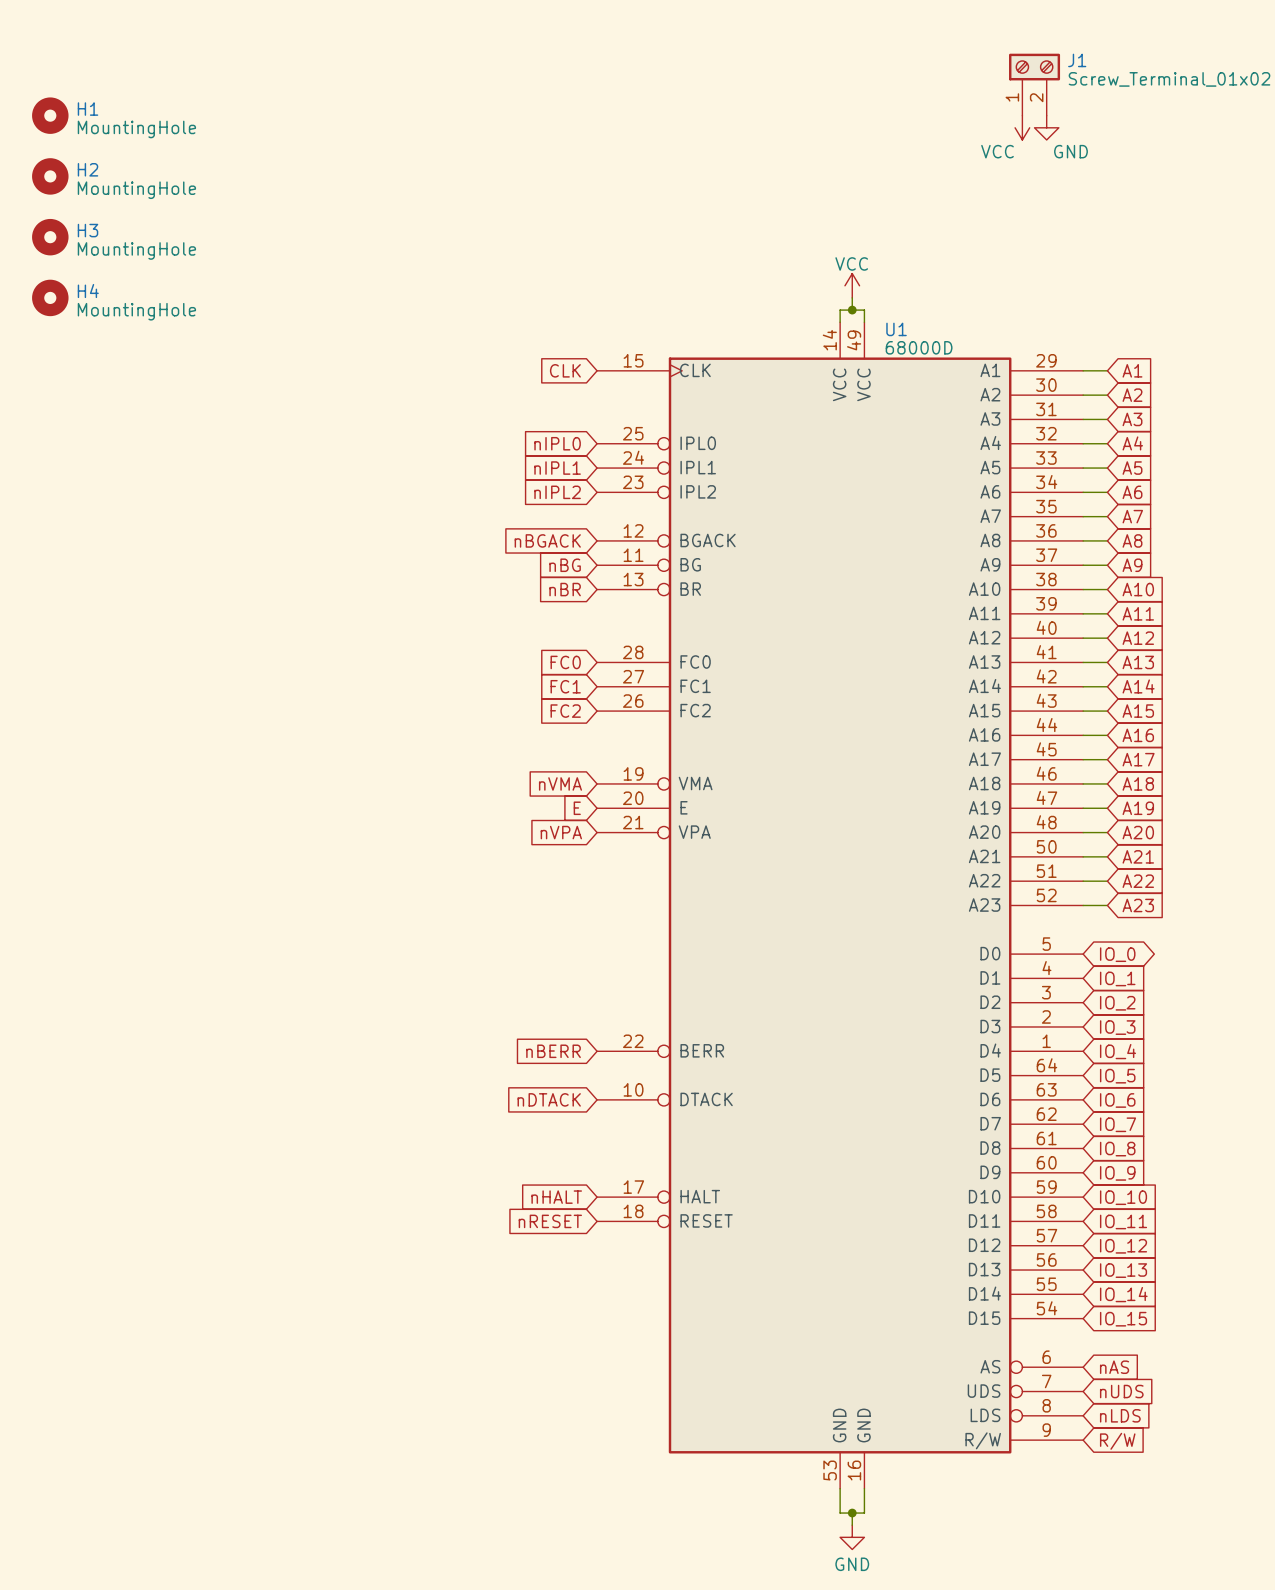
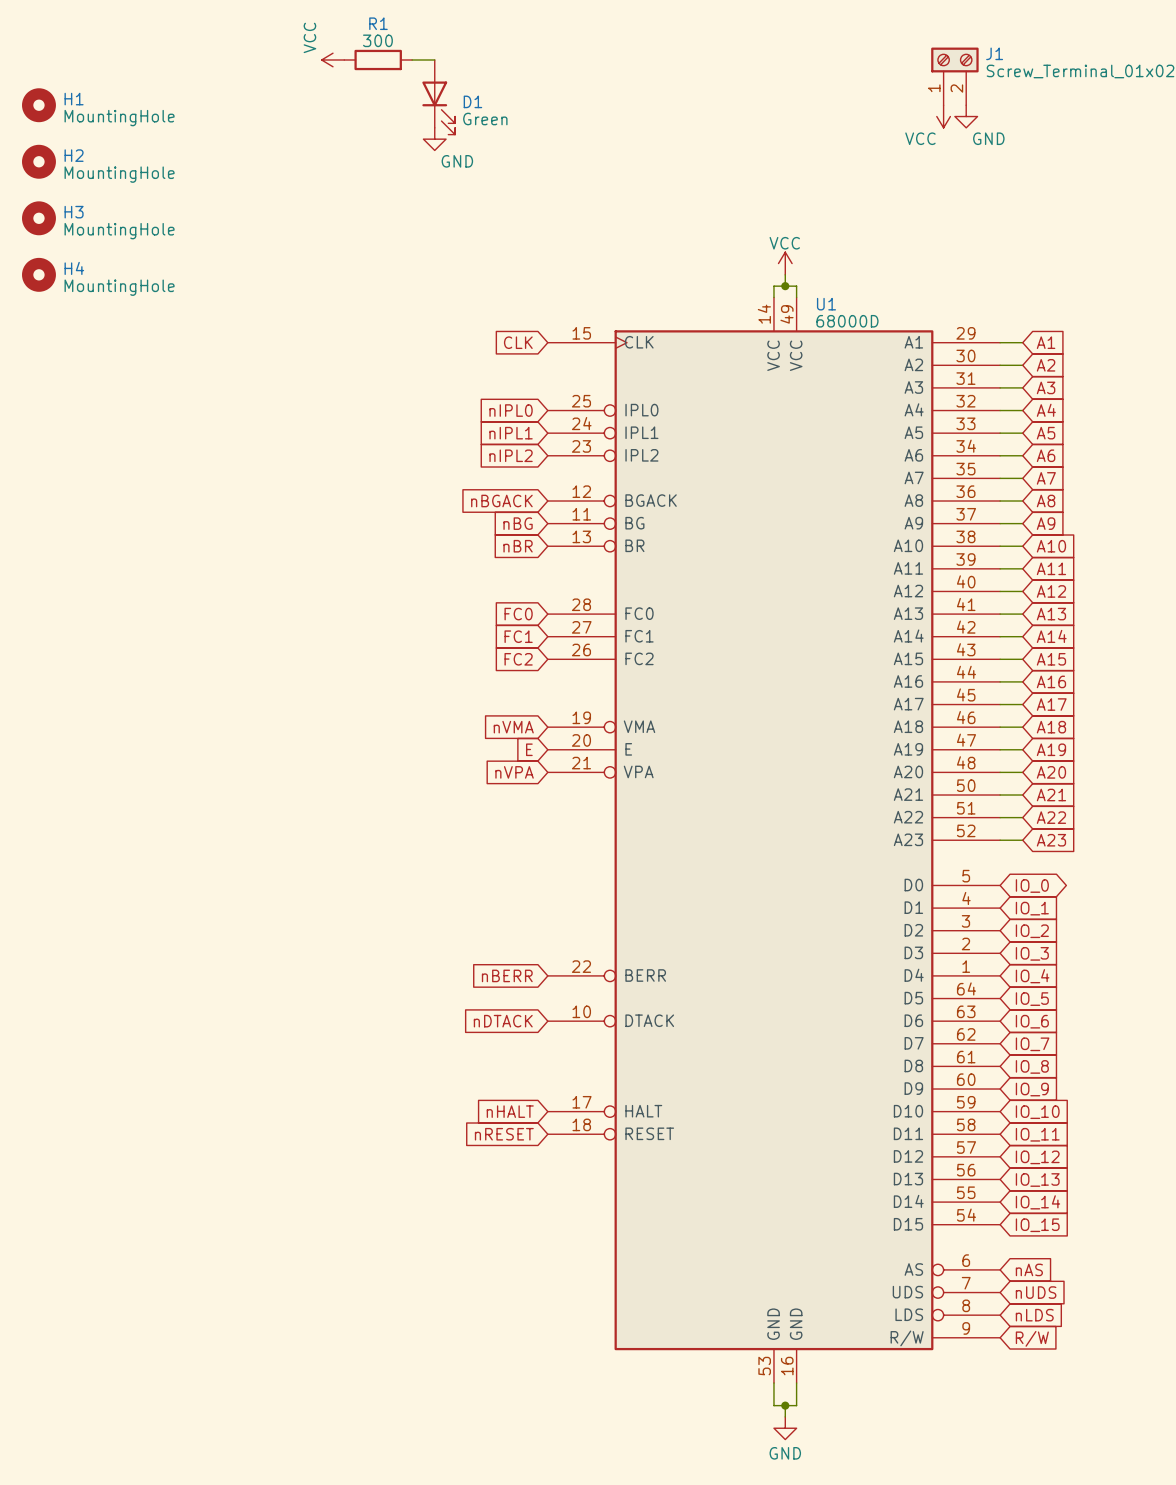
power symbol: none -> VCC (332, 59)
R1: none -> 300 (378, 59)
wire: none -> (412, 59) (434, 59)
D1: none -> Green (438, 97)
power symbol: none -> GND (434, 139)

